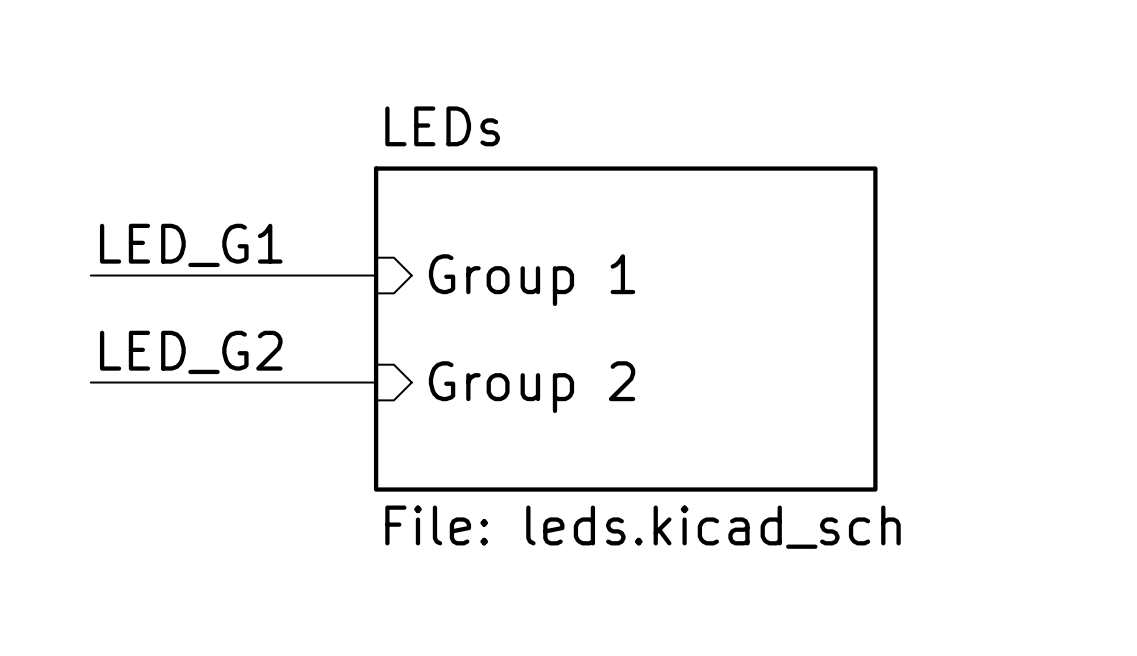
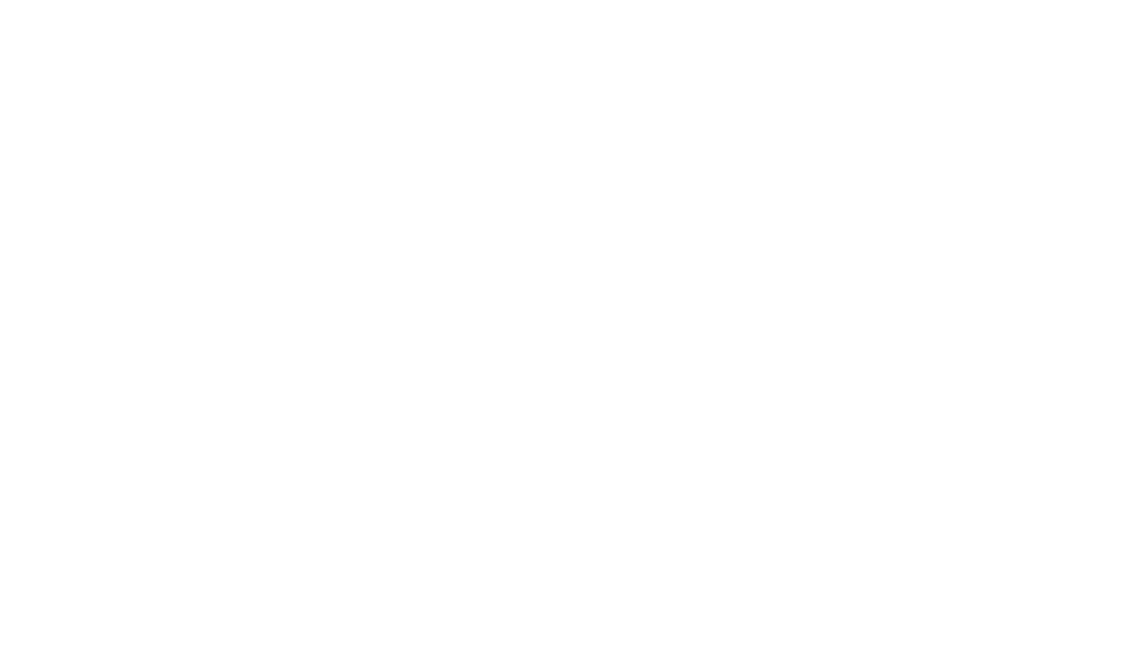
label: LED_G1 (191, 245) -> none
wire: (90, 275) (376, 275) -> none
sheet pin: Group 1 (532, 280) -> none
sheet LEDs: File: leds.kicad_sch (625, 329) -> none
label: LED_G2 (191, 352) -> none
wire: (90, 382) (376, 382) -> none
sheet pin: Group 2 (532, 387) -> none

